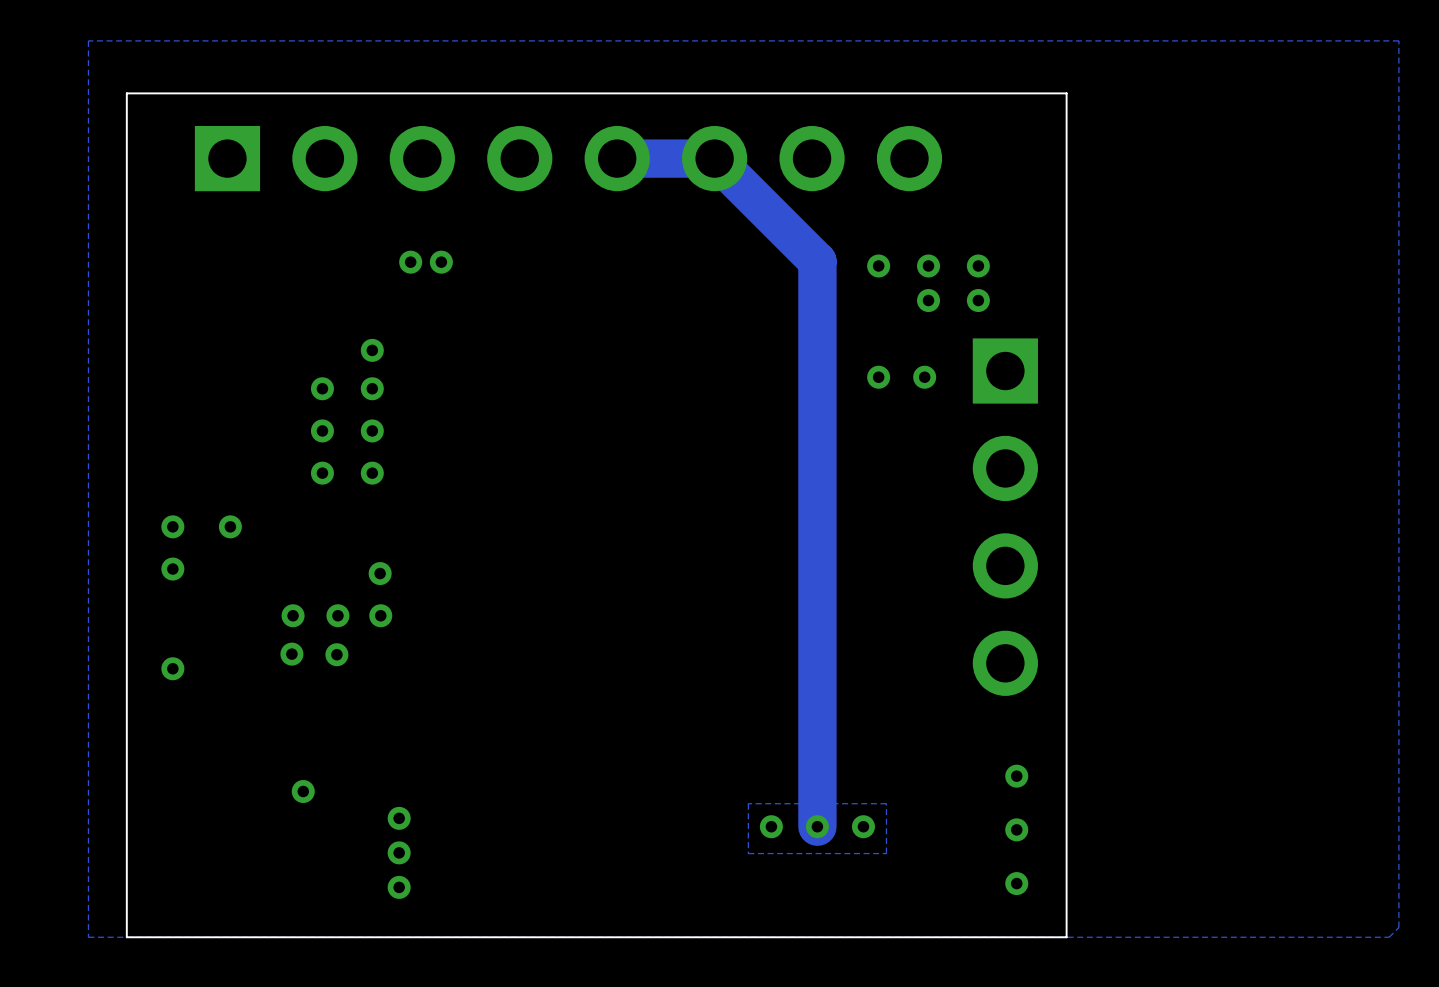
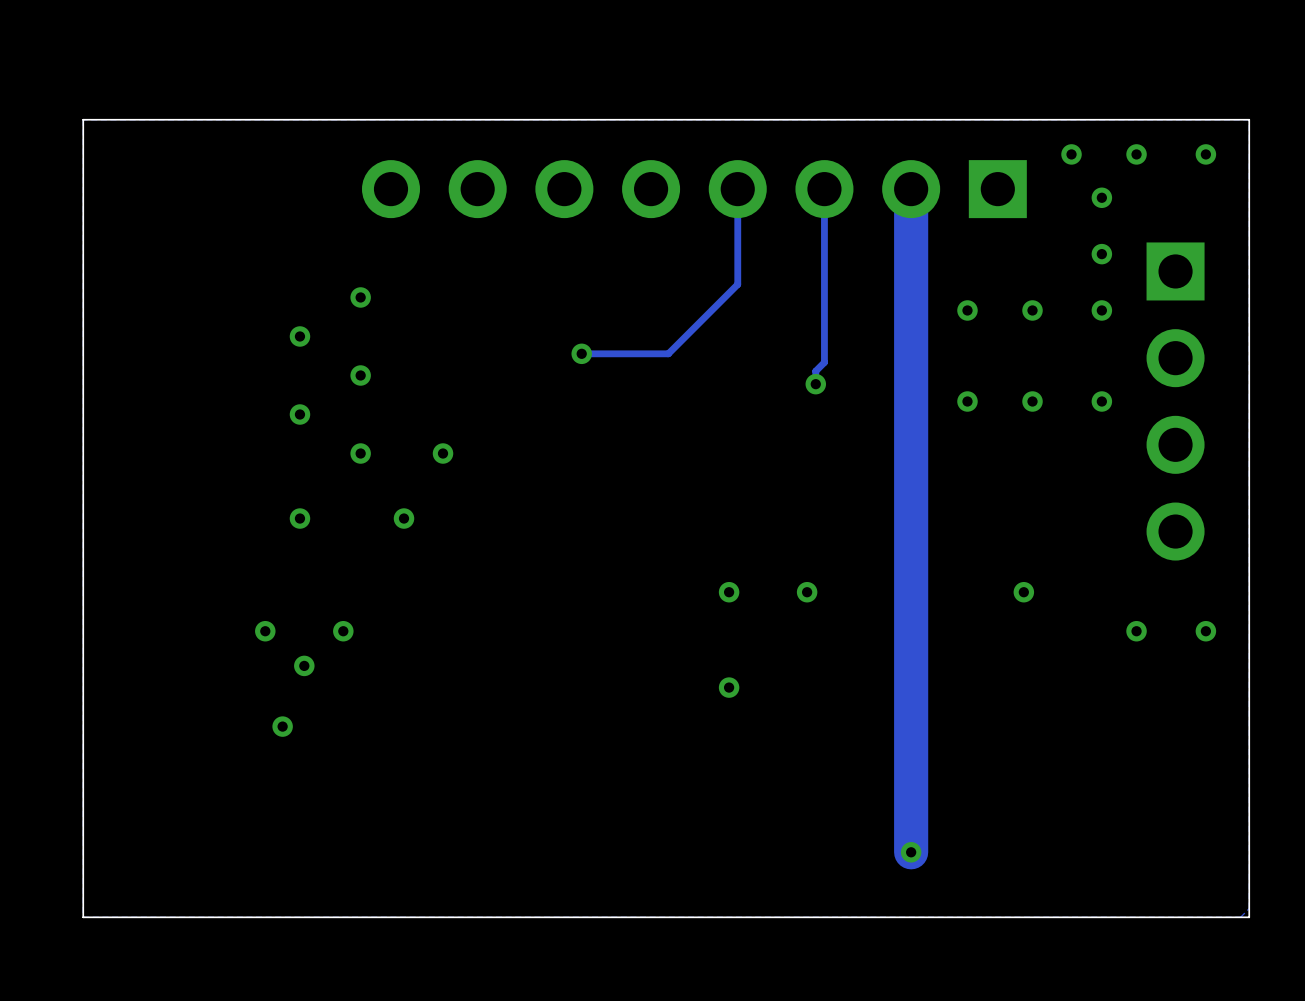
via: none -> (1071, 154)
via: none -> (1136, 154)
via: none -> (1205, 154)
track: none -> (737, 189) (737, 284) (668, 353) (581, 353)
track: none -> (824, 189) (824, 362) (815, 371) (815, 384)
track: none -> (911, 189) (911, 852)
via: none -> (1101, 197)
part rotation: 0° (568, 158) -> 180° (694, 189)
track: (617, 158) (714, 158) (817, 261) (817, 826) -> none
via: none -> (1101, 254)
via: none -> (967, 310)
via: none -> (1032, 310)
via: none -> (1101, 310)
via position: (410, 262) -> (360, 297)
via: (441, 262) -> none
via: (878, 266) -> none
via: (928, 266) -> none
via: (978, 266) -> none
via: none -> (299, 336)
via: (928, 300) -> none
via: (978, 300) -> none
via: none -> (581, 353)
via: none -> (360, 375)
via: none -> (815, 384)
via: (372, 350) -> none
via: none -> (967, 401)
via: none -> (1032, 401)
via: none -> (1101, 401)
via: (878, 377) -> none
via: (924, 377) -> none
via position: (322, 388) -> (299, 414)
via: (372, 388) -> none
via: none -> (360, 453)
via: none -> (443, 453)
via: (322, 430) -> none
via: (372, 430) -> none
via position: (322, 473) -> (299, 518)
via: (372, 473) -> none
via: none -> (404, 518)
part position: (1005, 517) -> (1175, 401)
via: (172, 526) -> none
via: (230, 526) -> none
via: (172, 569) -> none
via: none -> (729, 592)
via: none -> (807, 592)
via: none -> (1023, 592)
via: (380, 573) -> none
via: (337, 615) -> none
via: none -> (1136, 631)
via: none -> (1205, 631)
via: (291, 654) -> none
via: (172, 668) -> none
via: none -> (729, 687)
via: none -> (282, 726)
via: (1016, 776) -> none
via: (303, 791) -> none
zone outline: (886, 803) (748, 803) (748, 853) (886, 853) (886, 803) -> none
via: (399, 818) -> none
via: (771, 826) -> none
via: (817, 826) -> none
via: (863, 826) -> none
via: (1016, 829) -> none
via: (399, 852) -> none
via position: (1016, 883) -> (911, 852)
via: (399, 887) -> none
board edge: (1066, 937) (1066, 93) (126, 93) (126, 937) -> (953, 917) (1249, 917) (1249, 119) (83, 119) (83, 917) (117, 917)

